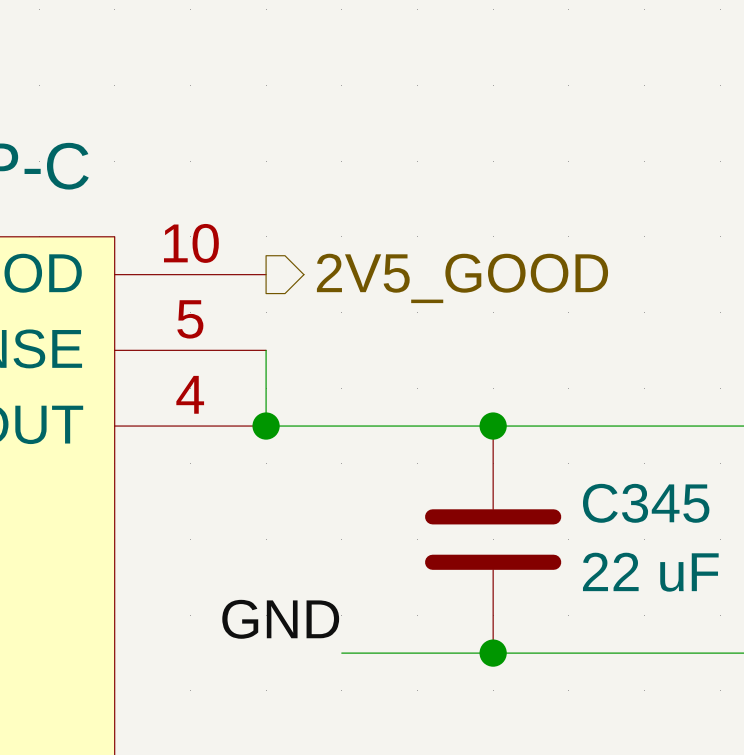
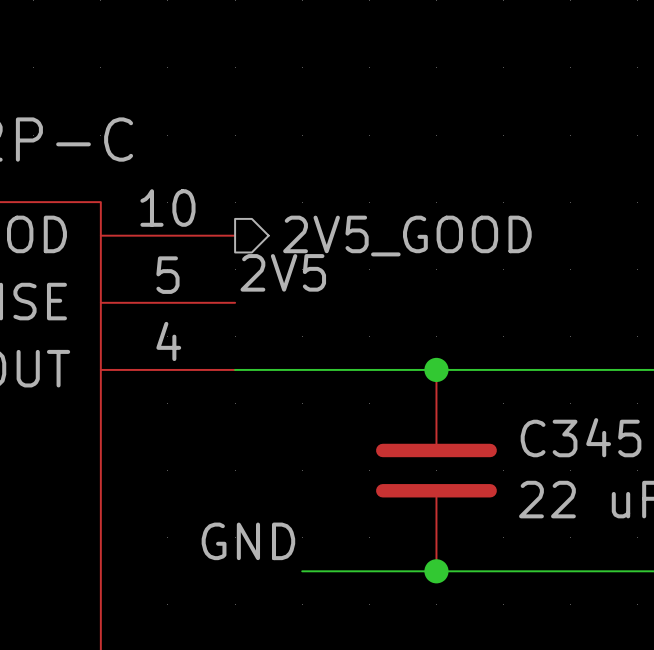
label: none -> 2V5 (283, 272)
wire: (266, 350) (266, 426) -> none
junction: (266, 426) -> none

